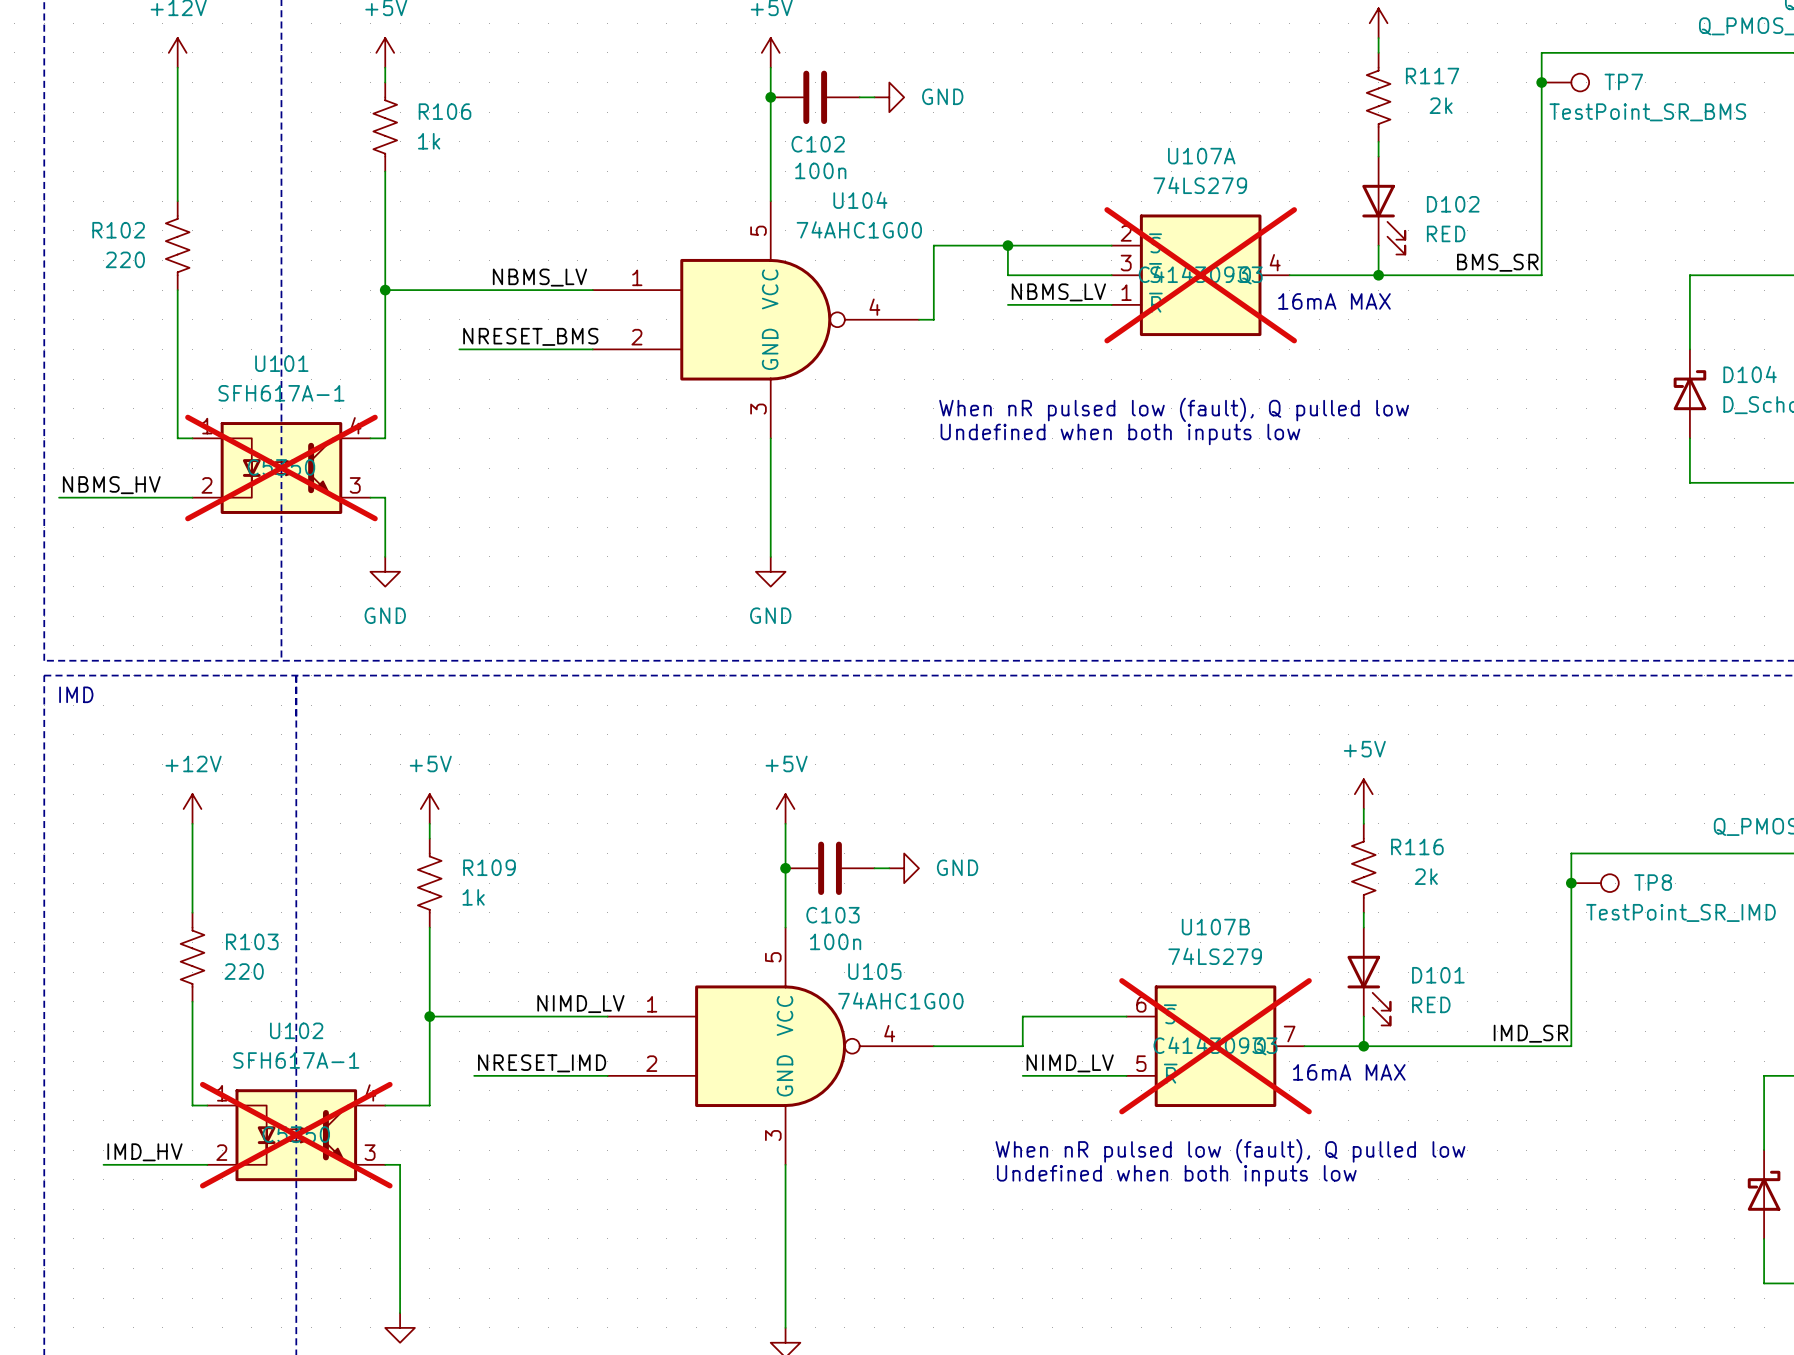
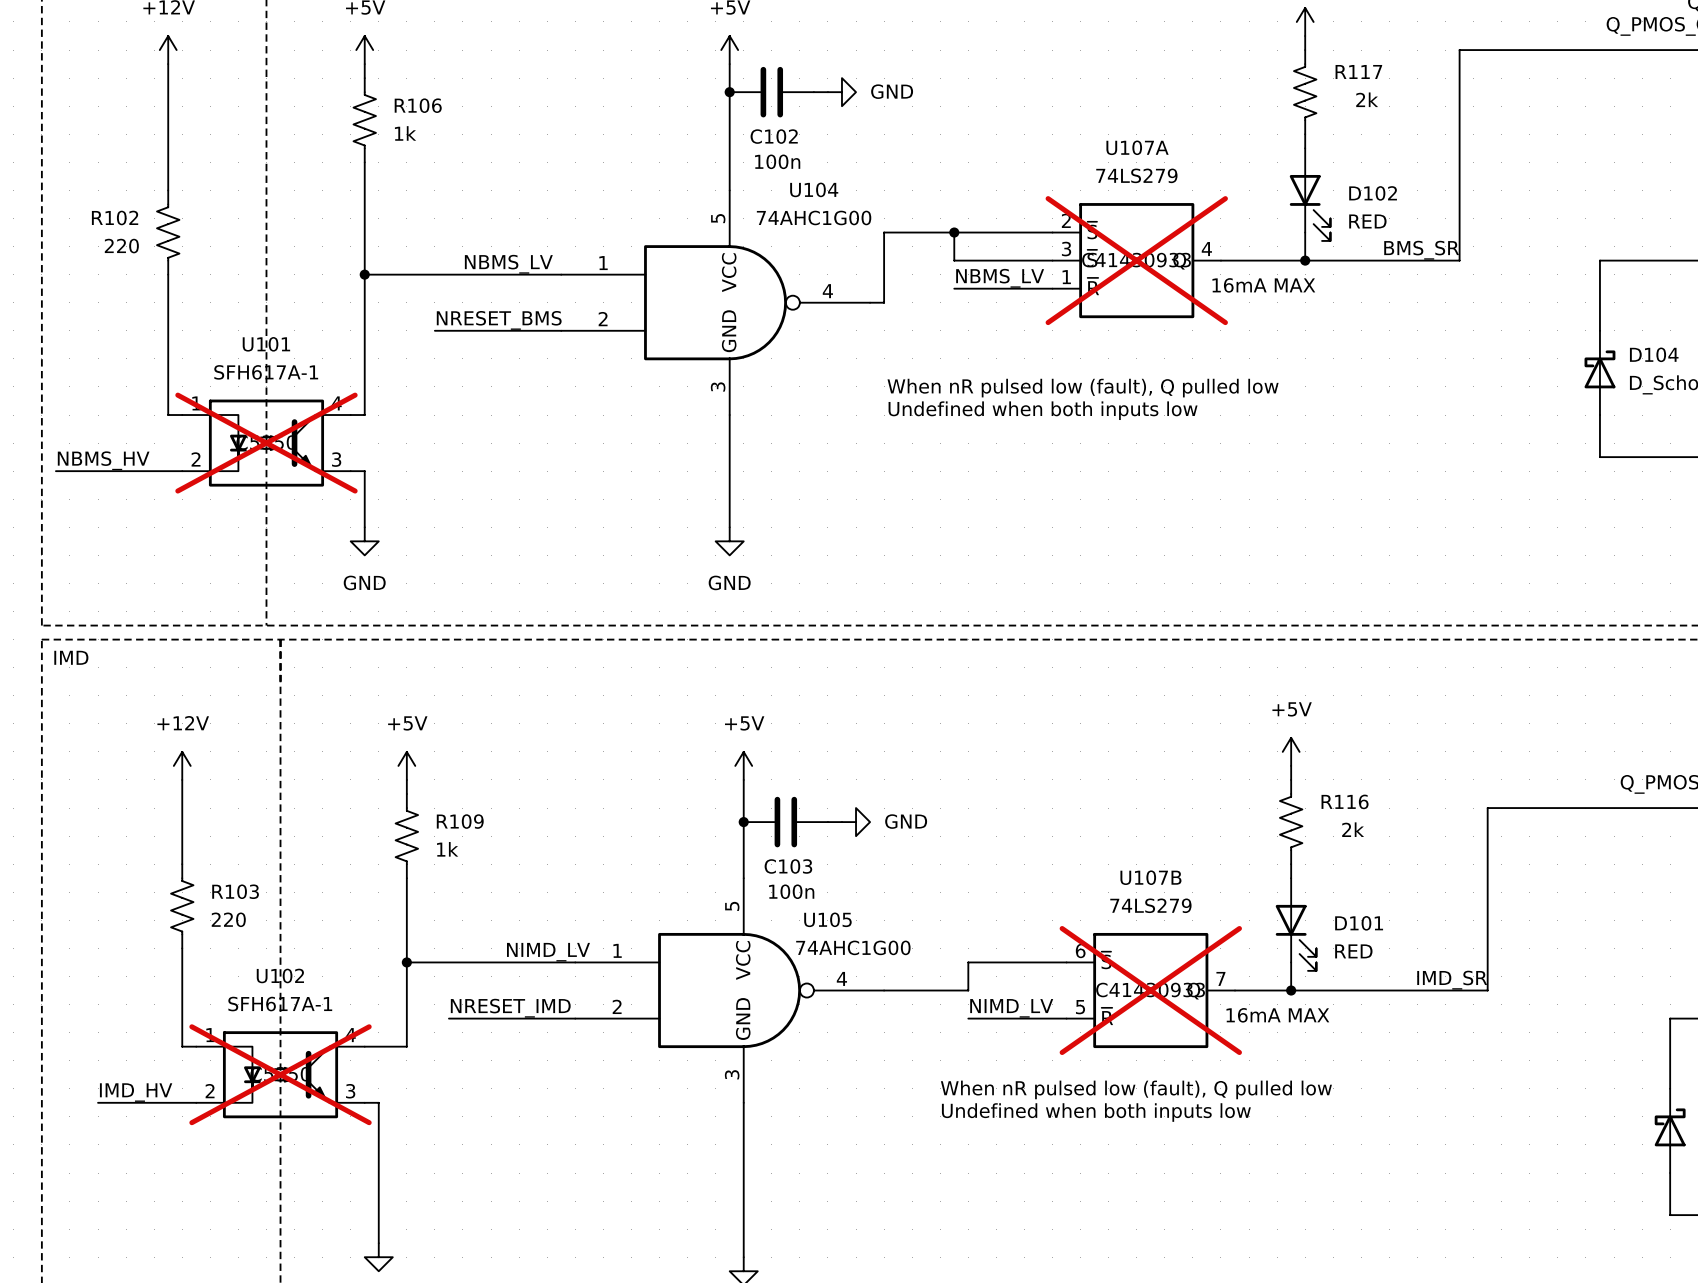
junction: (1541, 82) -> none
TP7: TestPoint_SR_BMS (1565, 82) -> none
junction: (1571, 883) -> none
TP8: TestPoint_SR_IMD (1595, 883) -> none

